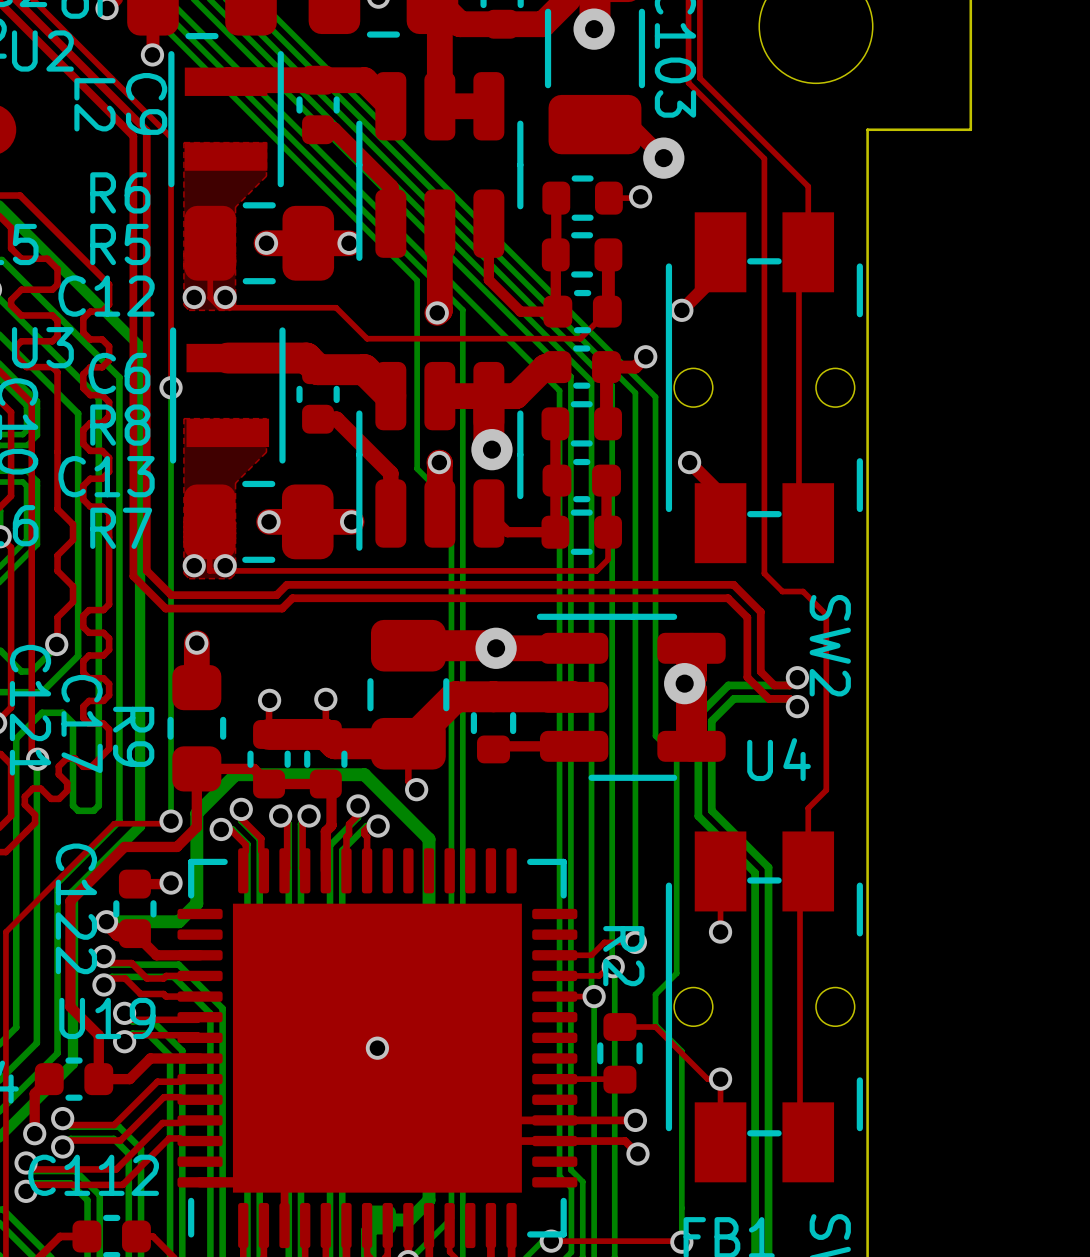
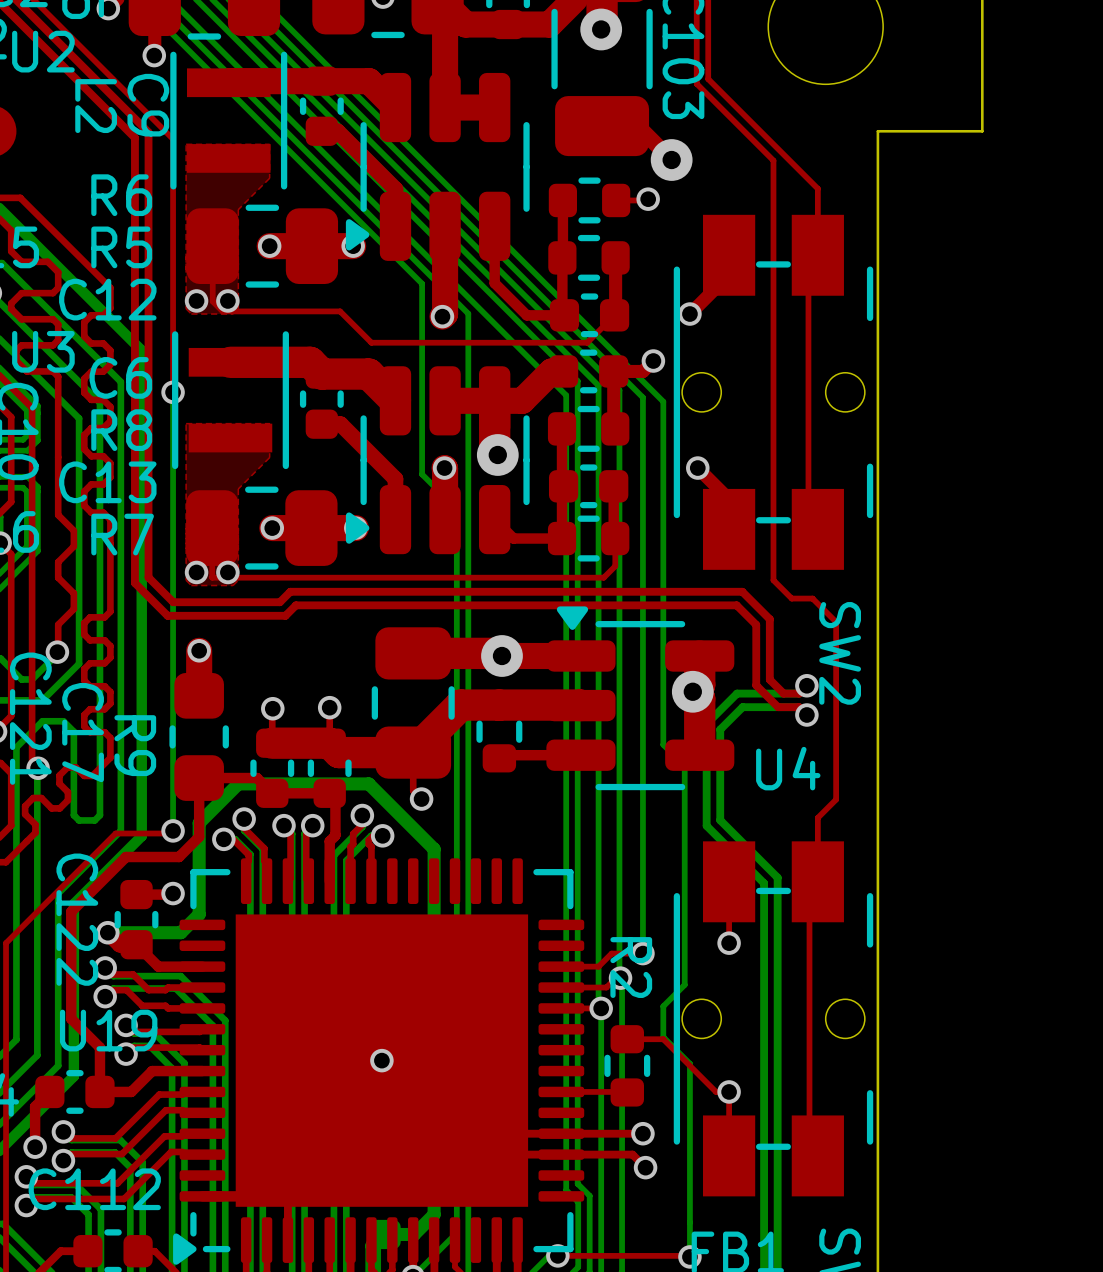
U2 footprint: [356, 72, 524, 261] -> [345, 72, 530, 261]
U3 footprint: [356, 361, 524, 551] -> [345, 366, 530, 555]
U4 footprint: [536, 613, 726, 781] -> [546, 606, 735, 791]
U19 footprint: [177, 848, 578, 1249] -> [173, 858, 585, 1265]

